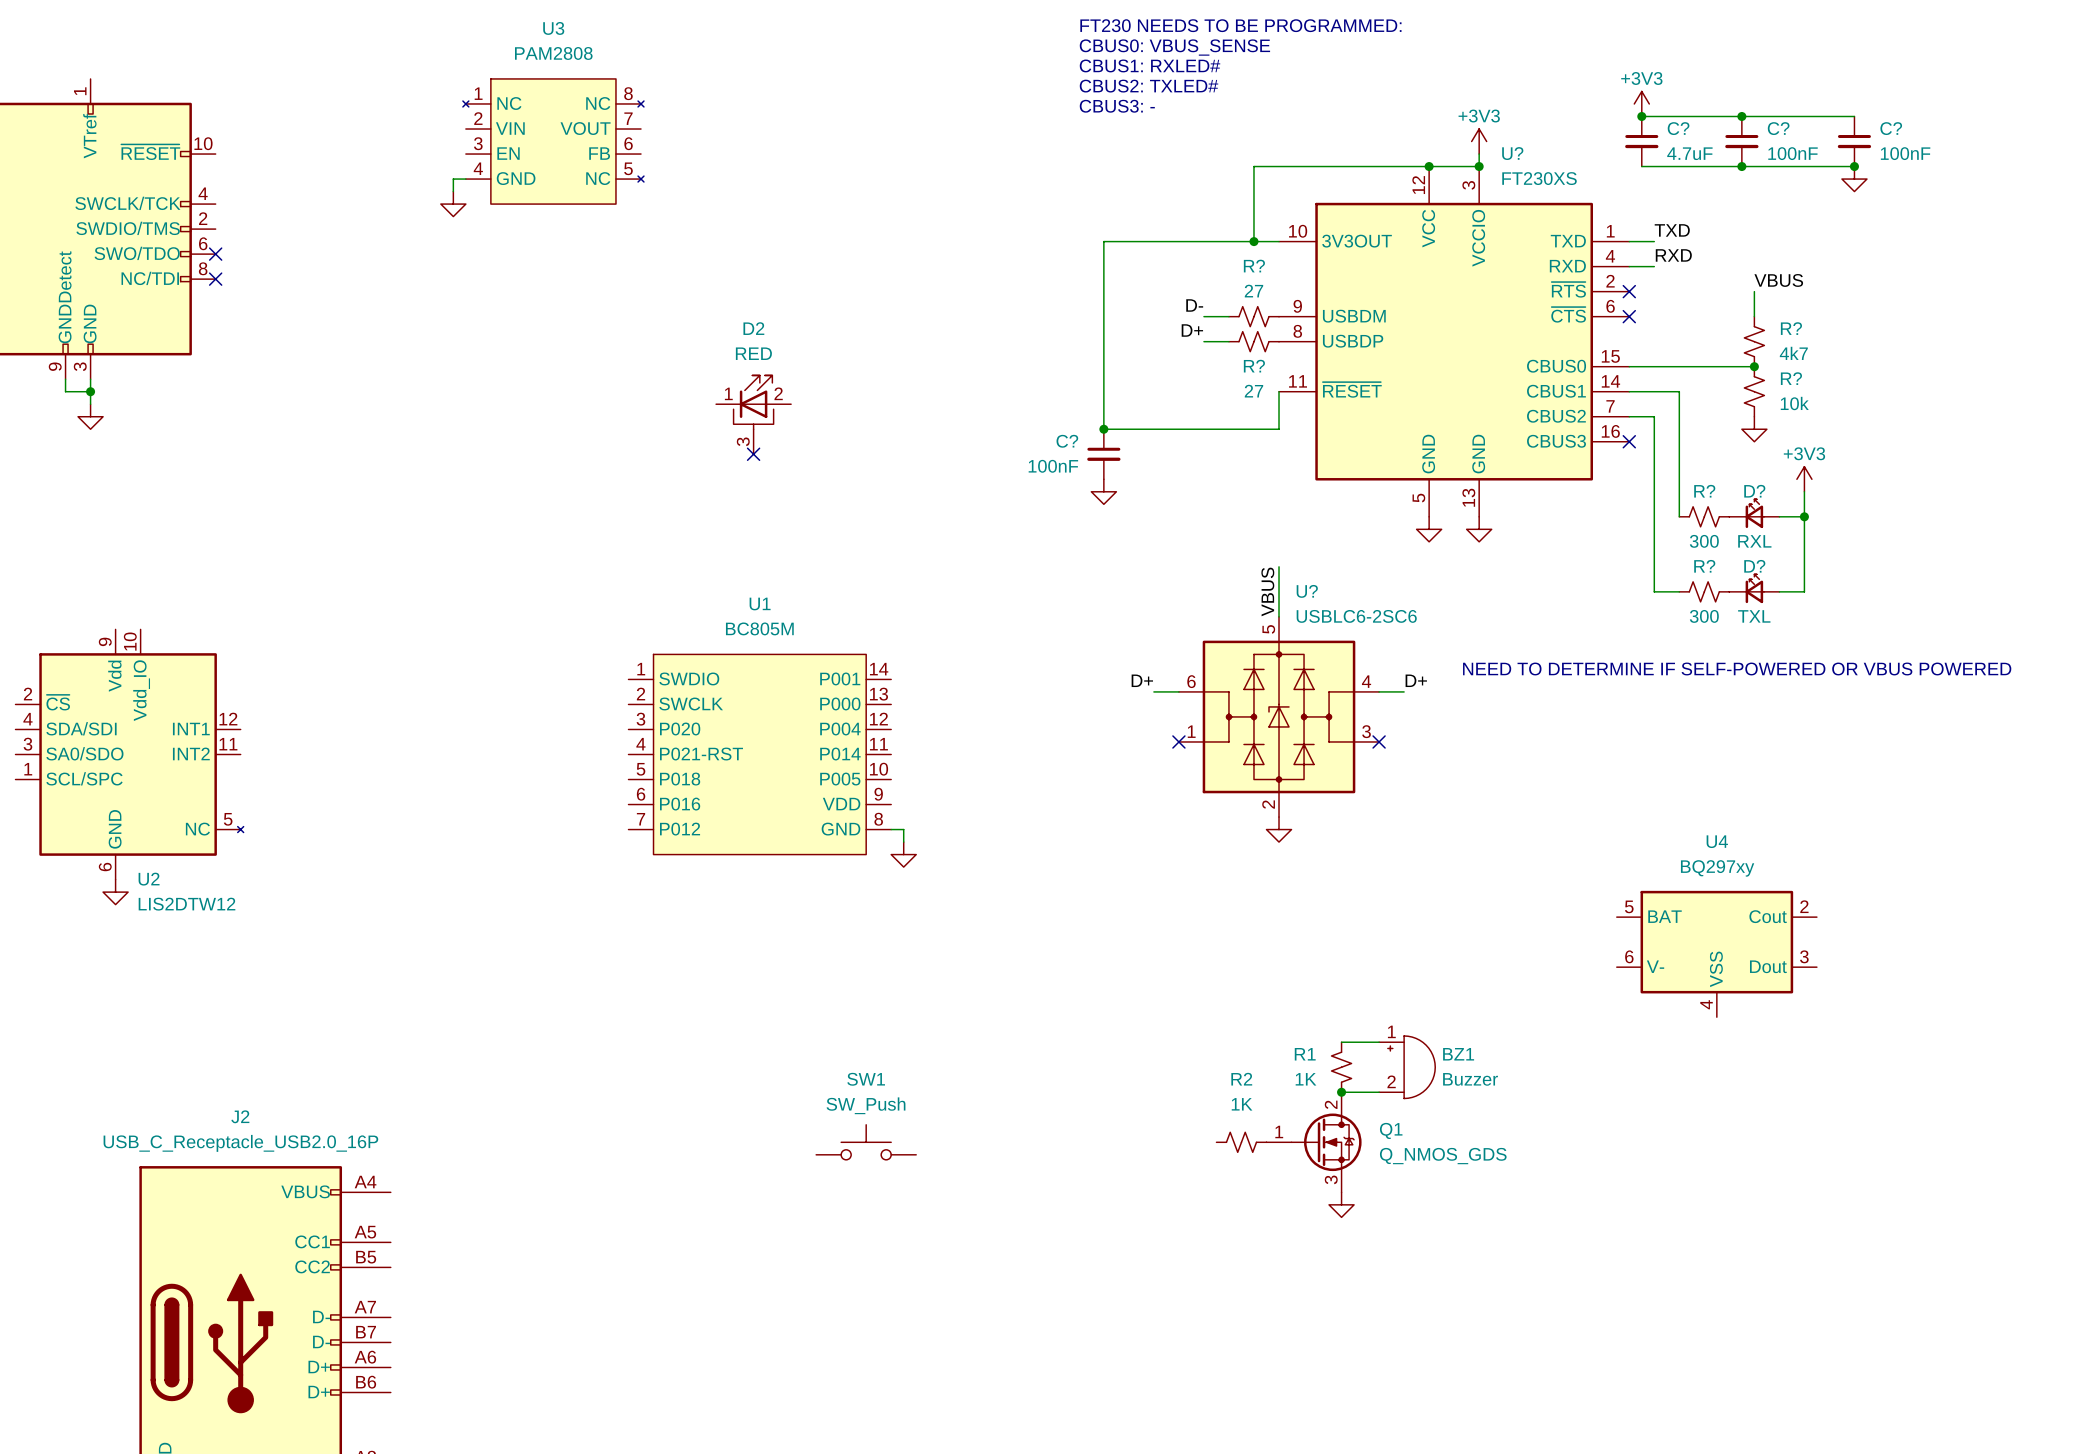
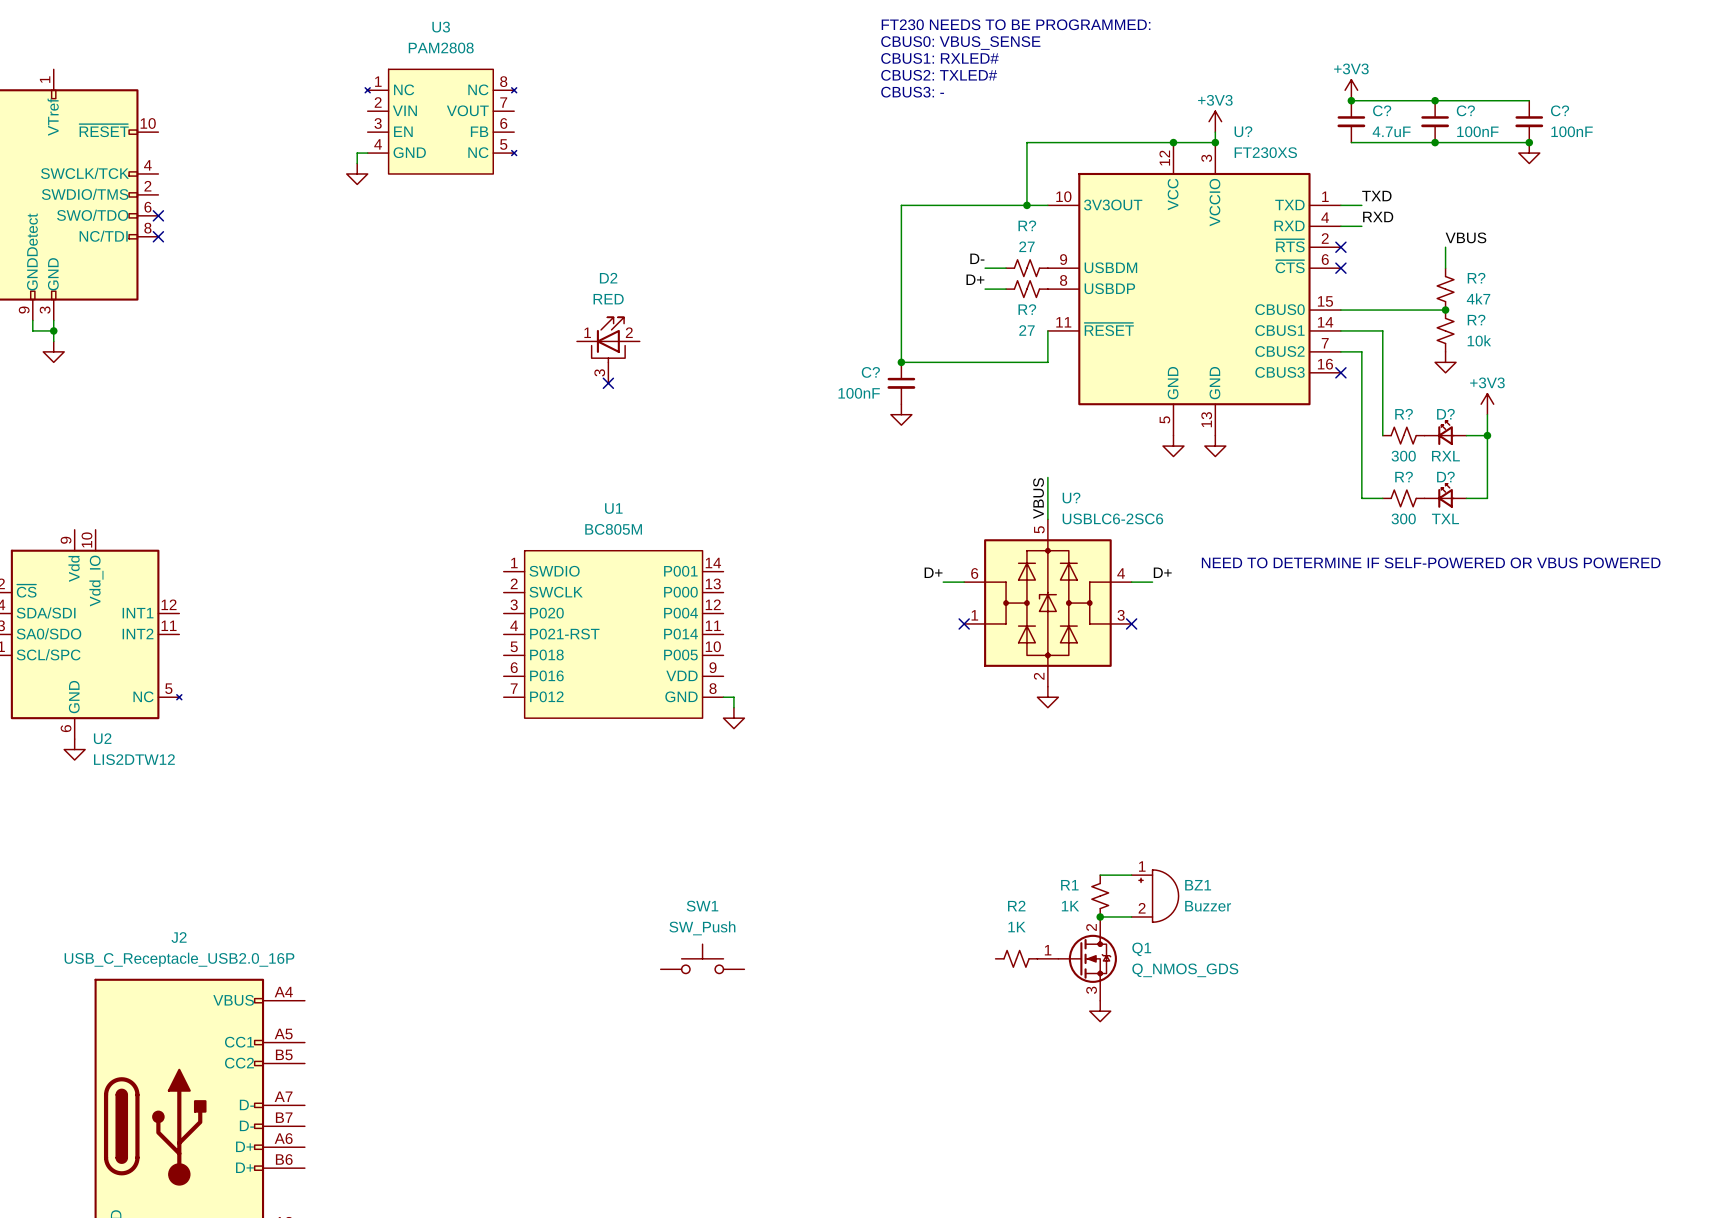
U4: BQ297xy (1716, 954) -> none

